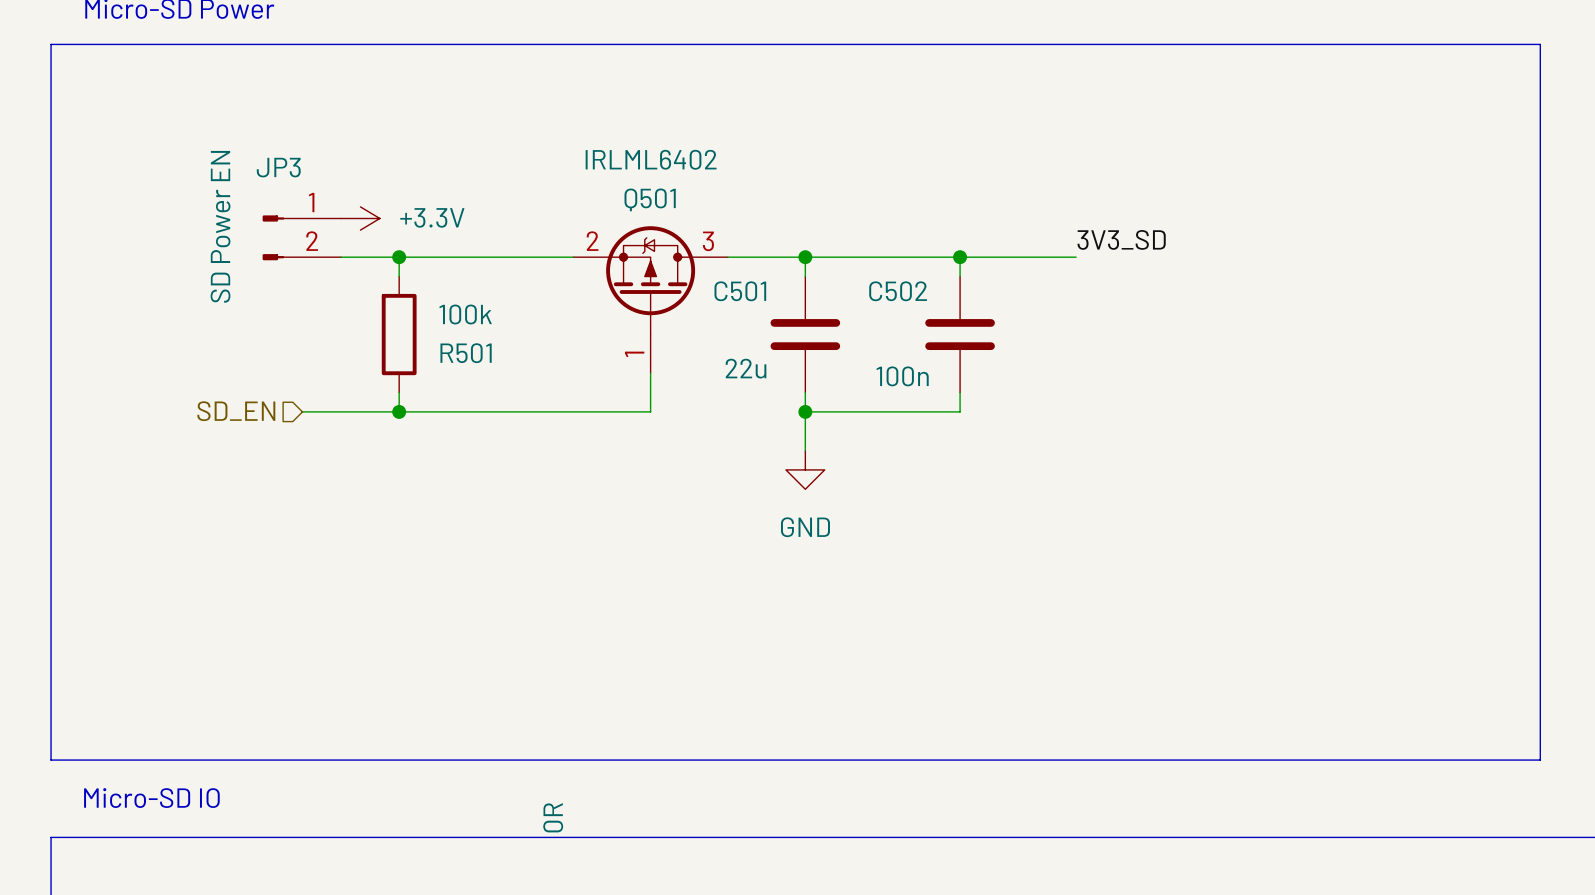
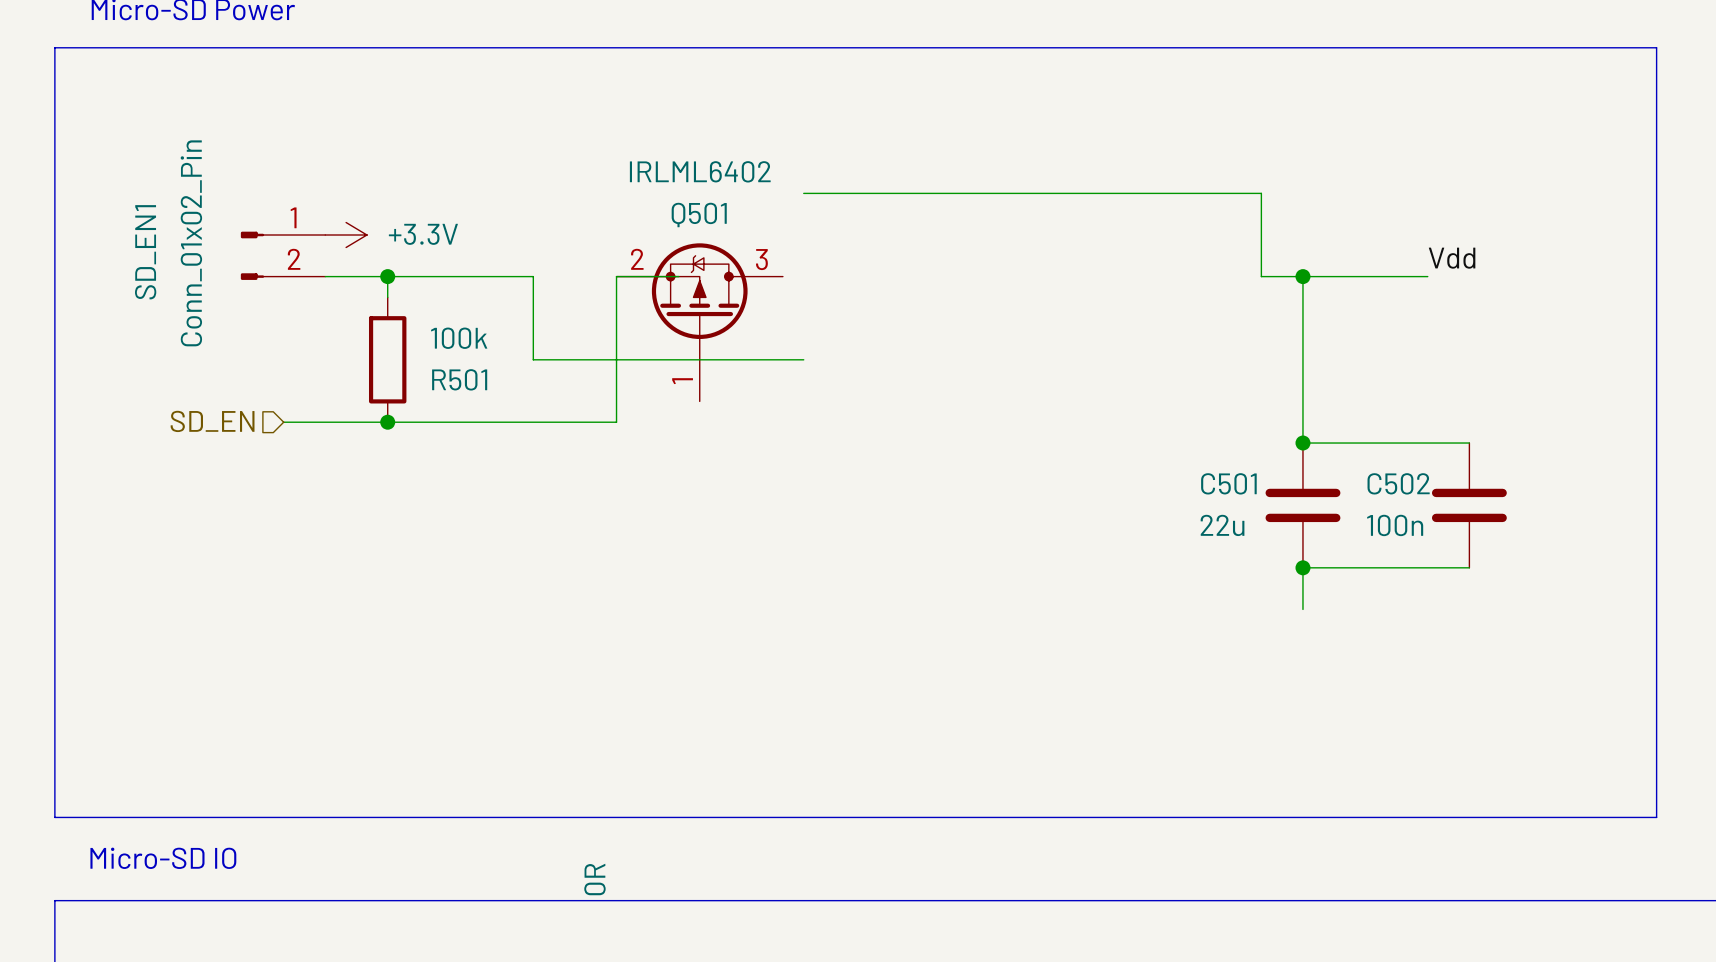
wire: none -> (803, 193) (1261, 193) (1261, 276) (1427, 276)
power symbol position: +3.3V (360, 218) -> +3.3V (346, 235)
SD_EN1: none -> Conn_01x02_Pin (283, 255)
JP3: (301, 237) -> none
label: 3V3_SD (1121, 239) -> none
label: none -> Vdd (1452, 258)
wire: (399, 257) (399, 276) -> (387, 276) (387, 297)
junction position: (399, 257) -> (387, 276)
wire: (495, 257) (573, 257) -> (533, 276) (533, 359) (803, 359)
wire: none -> (678, 276) (616, 276) (616, 422) (283, 422)
wire: (727, 257) (1076, 257) -> none
wire: (805, 257) (805, 276) -> none
junction: (805, 257) -> none
wire: (960, 257) (960, 276) -> none
junction: (960, 257) -> none
wire: none -> (1302, 276) (1302, 443) (1469, 443)
junction: none -> (1302, 276)
C501 name position: C501 (740, 291) -> C501 (1228, 483)
C502 name position: C502 (898, 291) -> C502 (1398, 483)
R501 position: (399, 334) -> (387, 359)
C501 position: (805, 334) -> (1302, 505)
C502 position: (960, 334) -> (1469, 505)
C501 value position: 22u (746, 368) -> 22u (1222, 525)
wire: (650, 373) (650, 411) (302, 411) -> none
C502 value position: 100n (902, 376) -> 100n (1395, 525)
wire: (399, 392) (399, 411) -> none
wire: (805, 392) (805, 450) -> none
wire: (960, 392) (960, 411) (805, 411) -> none
hierarchical label position: SD_EN (236, 411) -> SD_EN (212, 421)
junction position: (399, 411) -> (387, 422)
junction: (805, 411) -> none
junction: none -> (1302, 443)
power symbol: GND (805, 469) -> none
junction: none -> (1302, 567)
wire: none -> (1469, 567) (1302, 567) (1302, 609)

